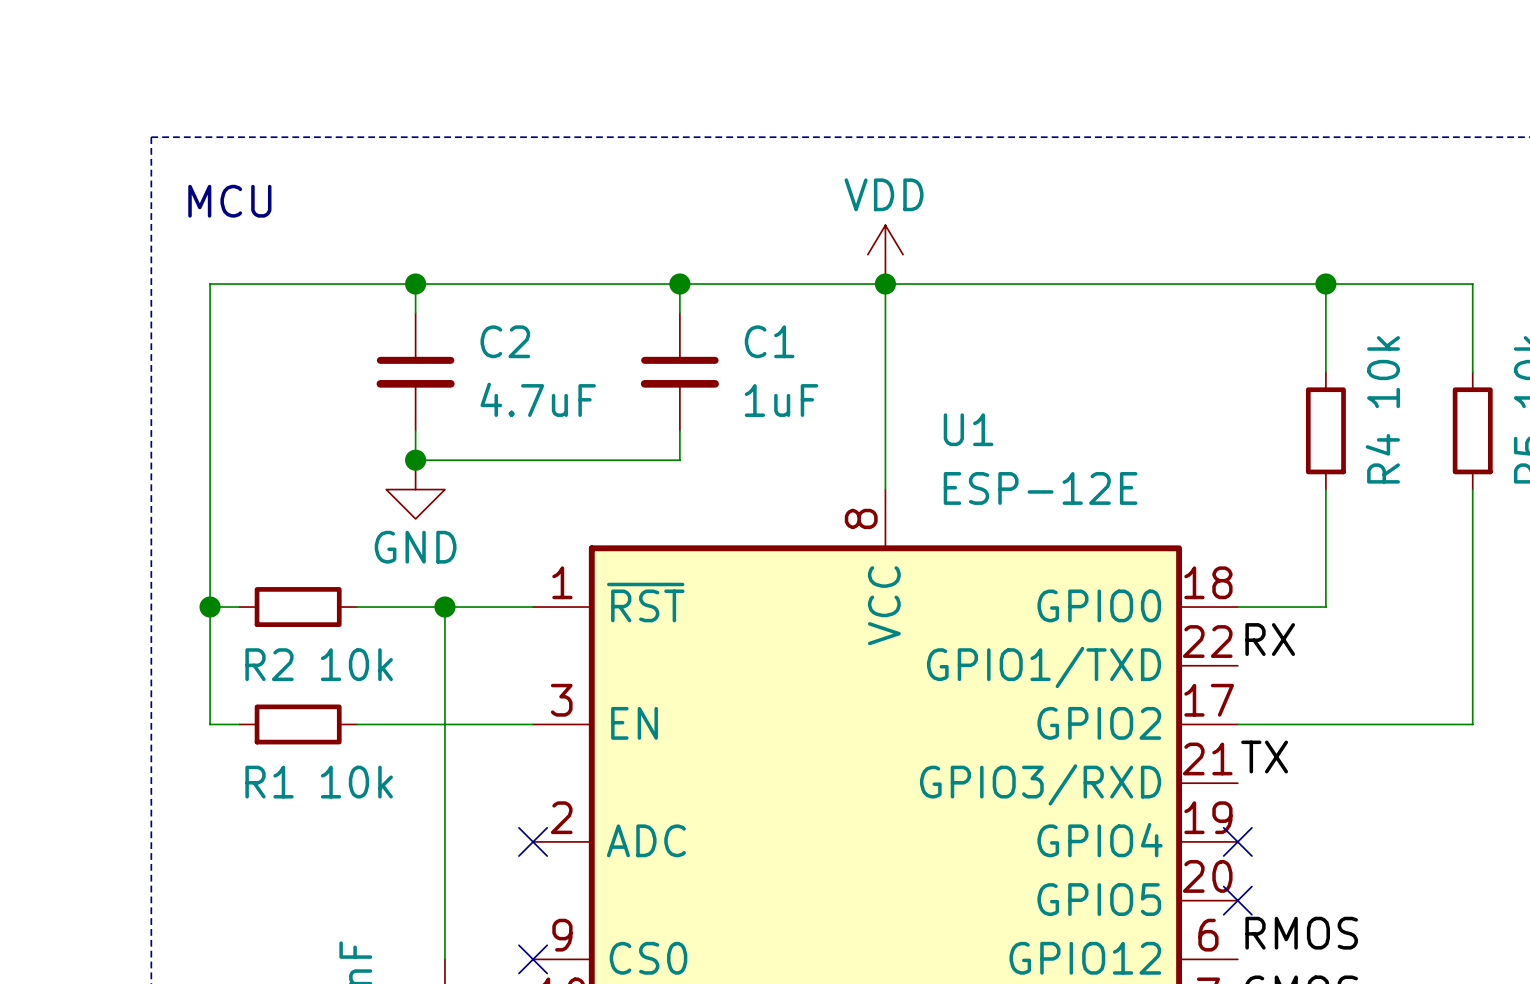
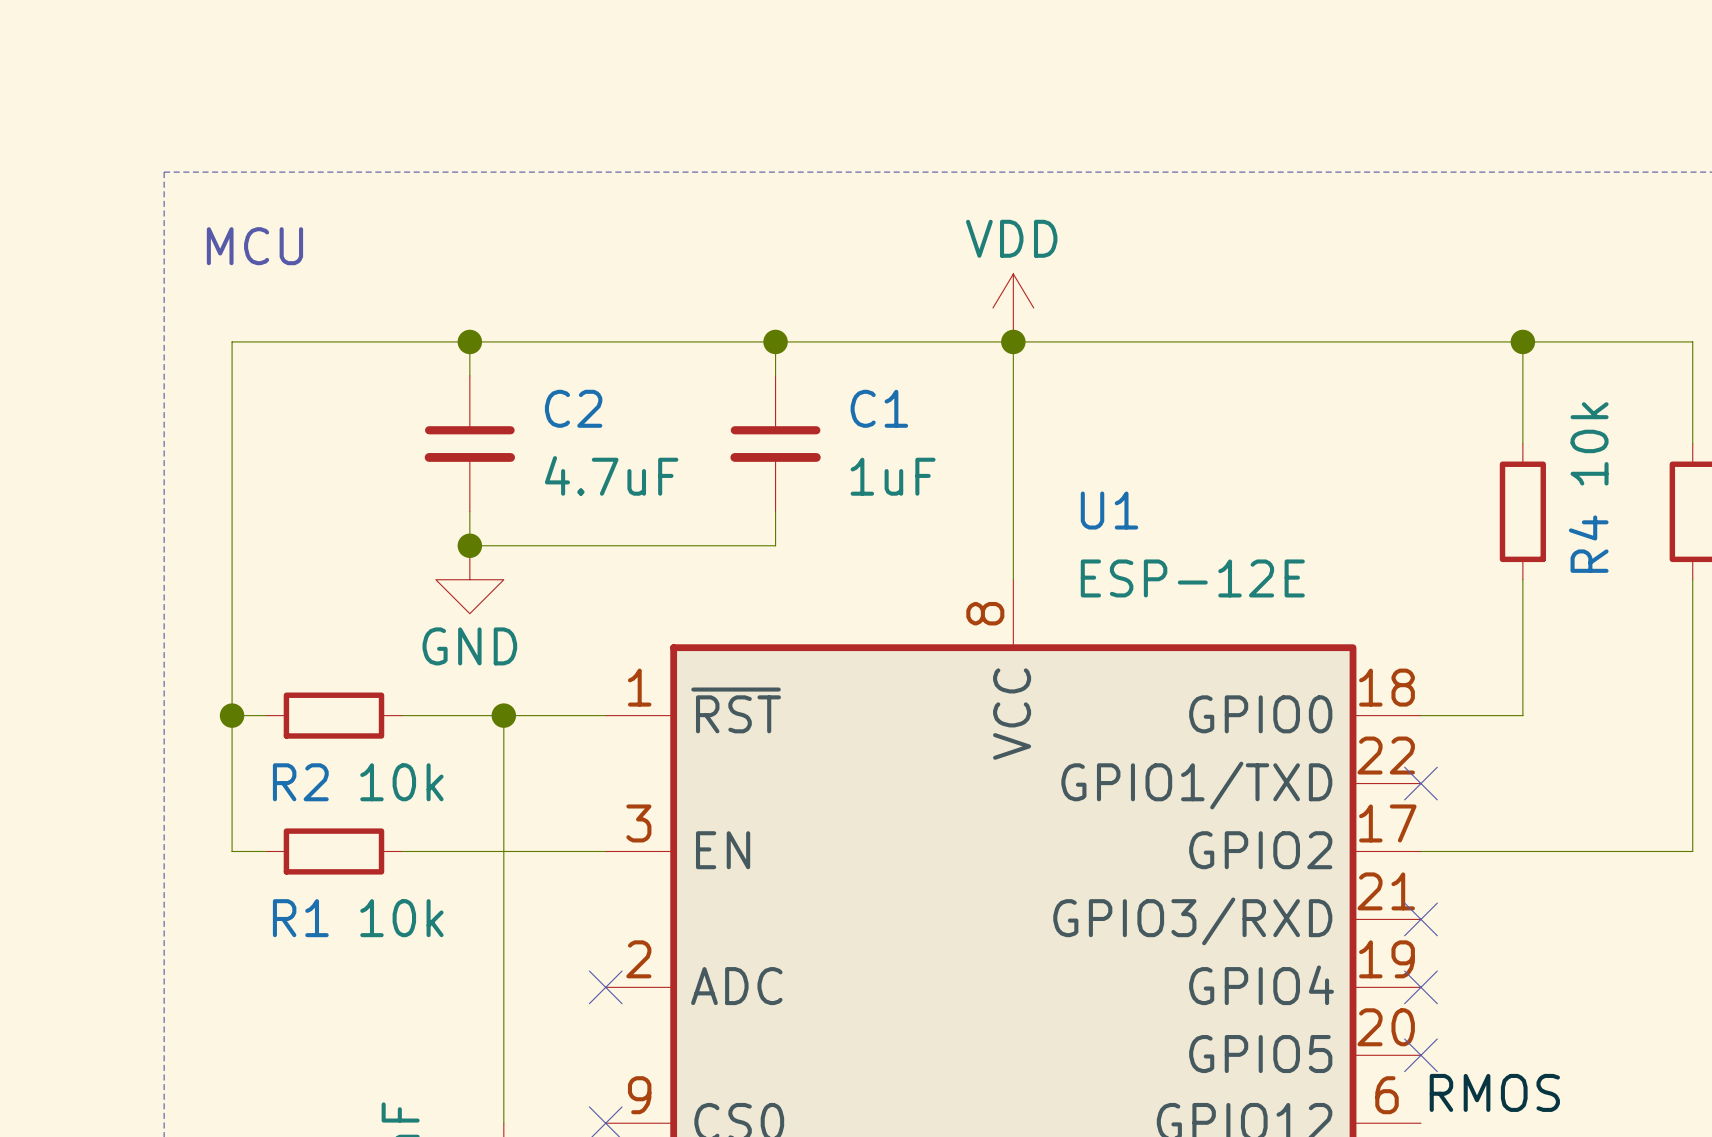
label: RX (1270, 639) -> none
no-connect mark: none -> (1420, 783)
label: TX (1264, 756) -> none
no-connect mark: none -> (1420, 919)

